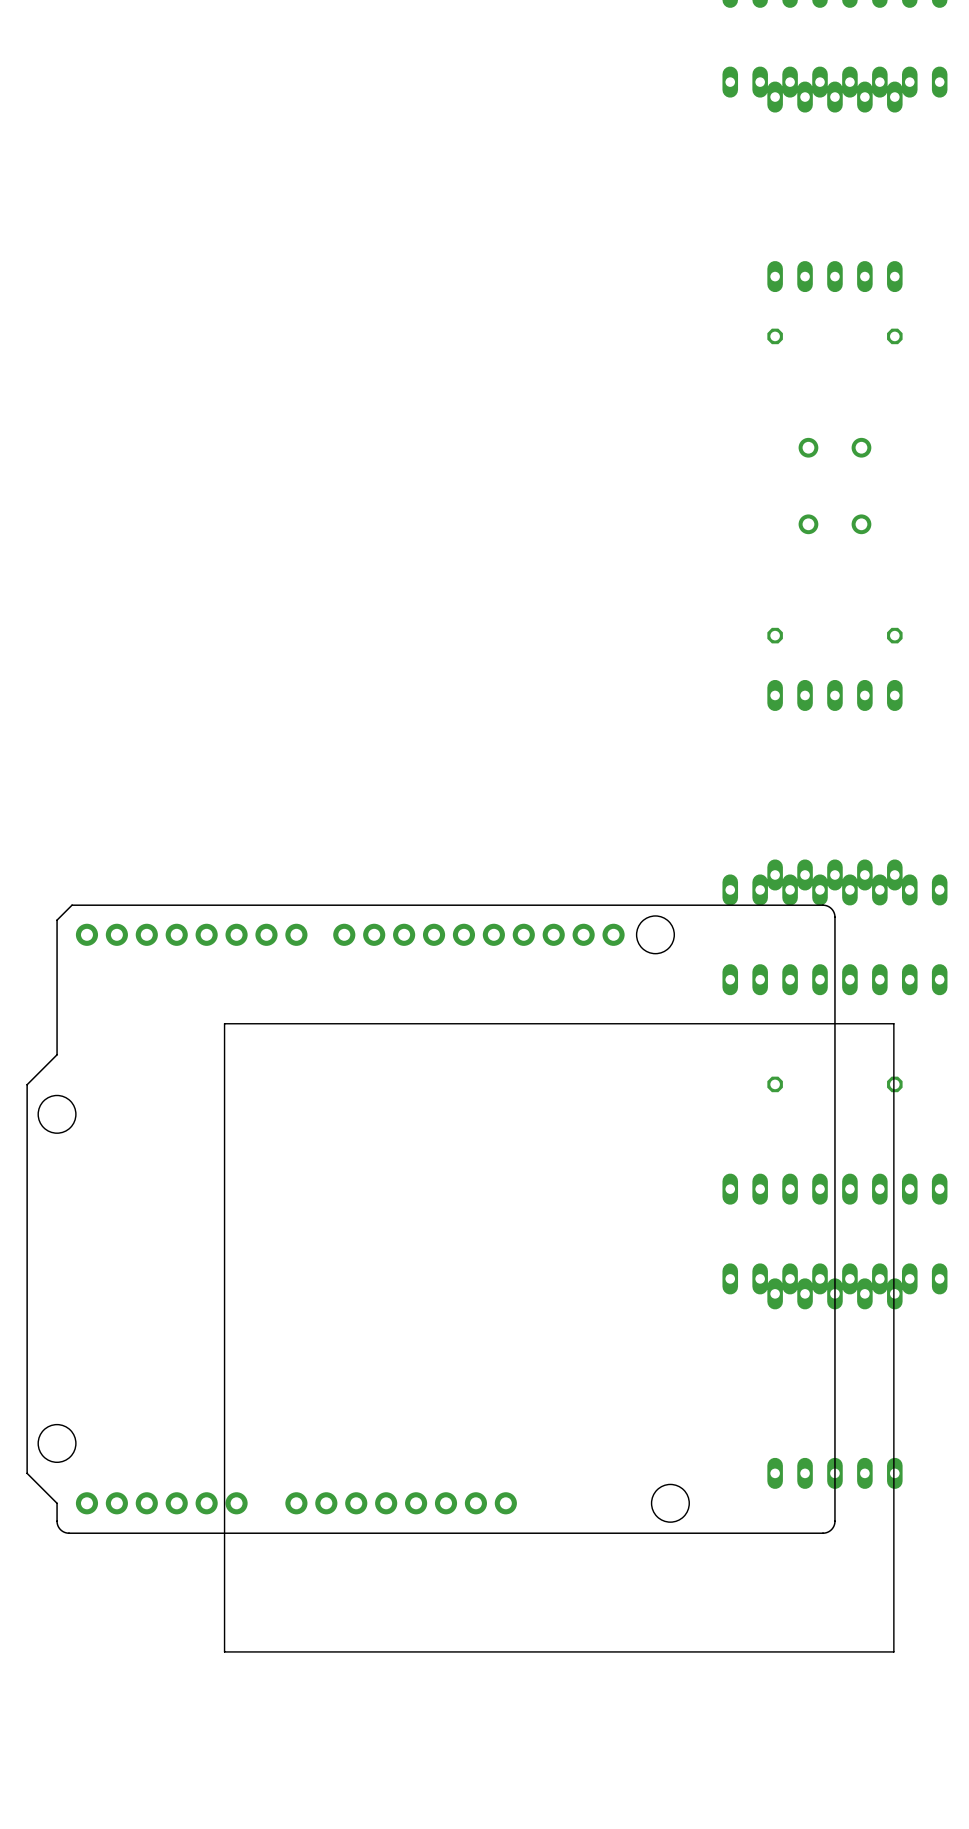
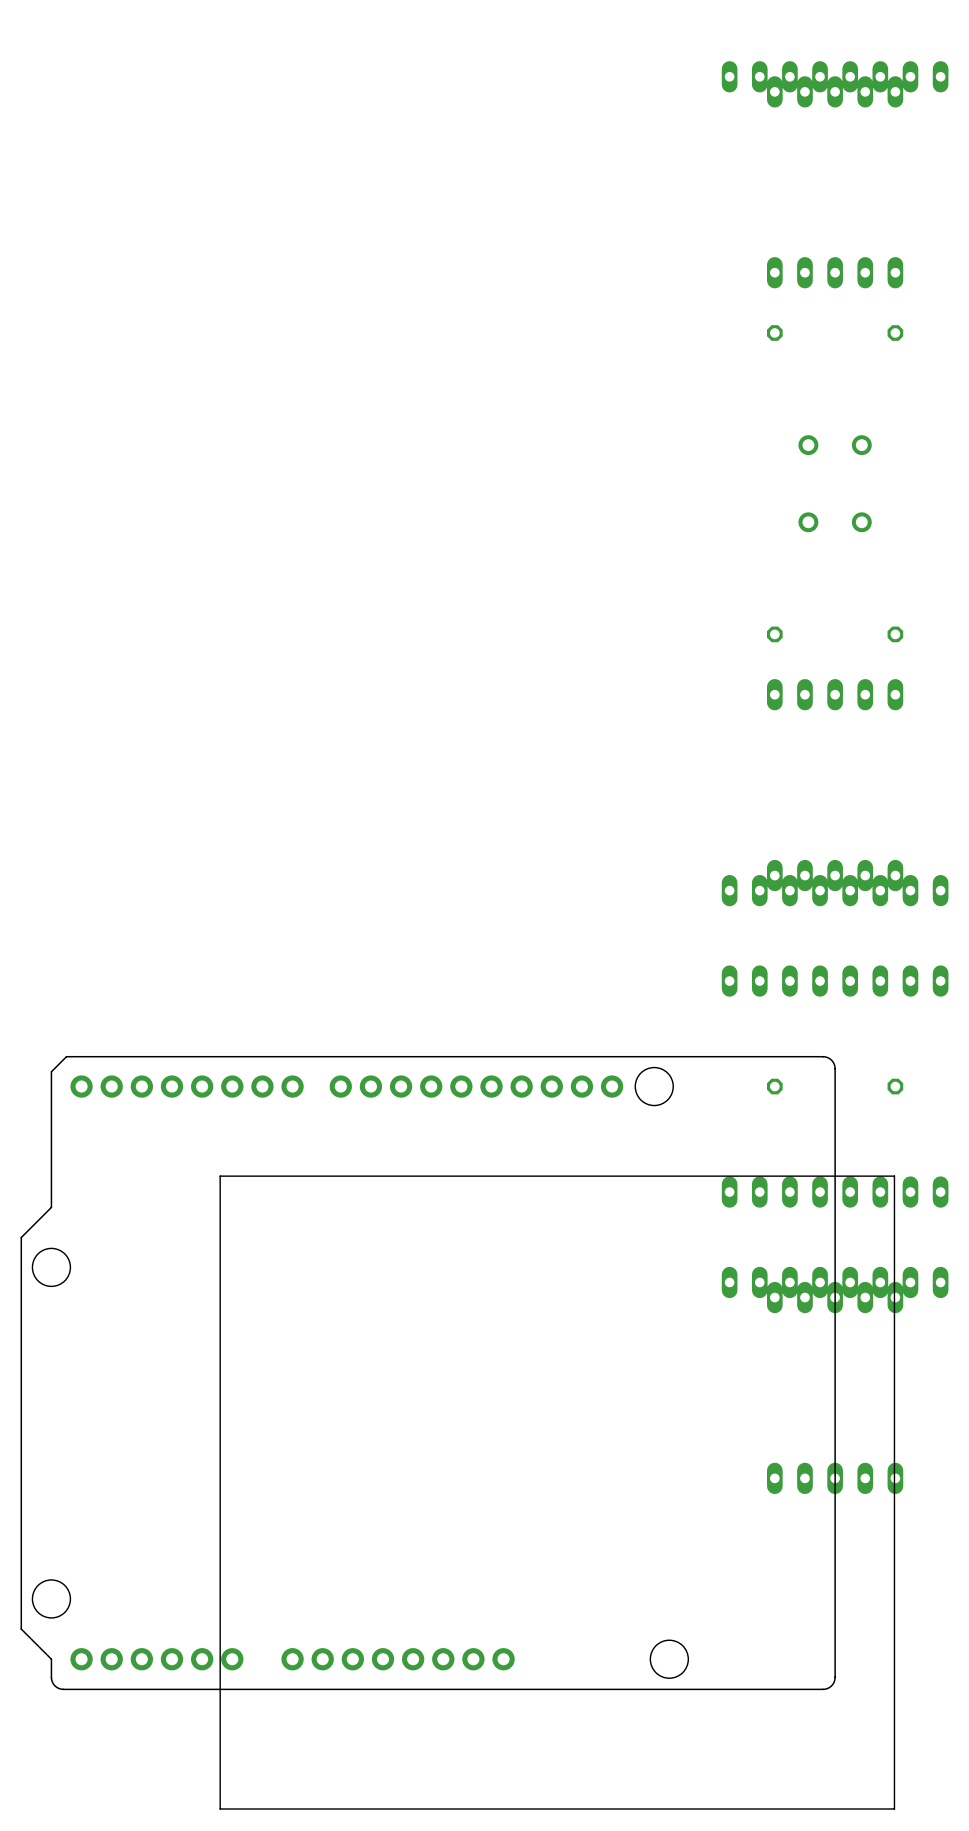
board edge: (893, 1173) (893, 1023) (224, 1023) (224, 1173) -> (894, 1176) (220, 1176)
part position: (431, 1219) -> (428, 1373)
board edge: (893, 1651) (224, 1651) -> (894, 1658) (894, 1808) (220, 1808) (220, 1658)

